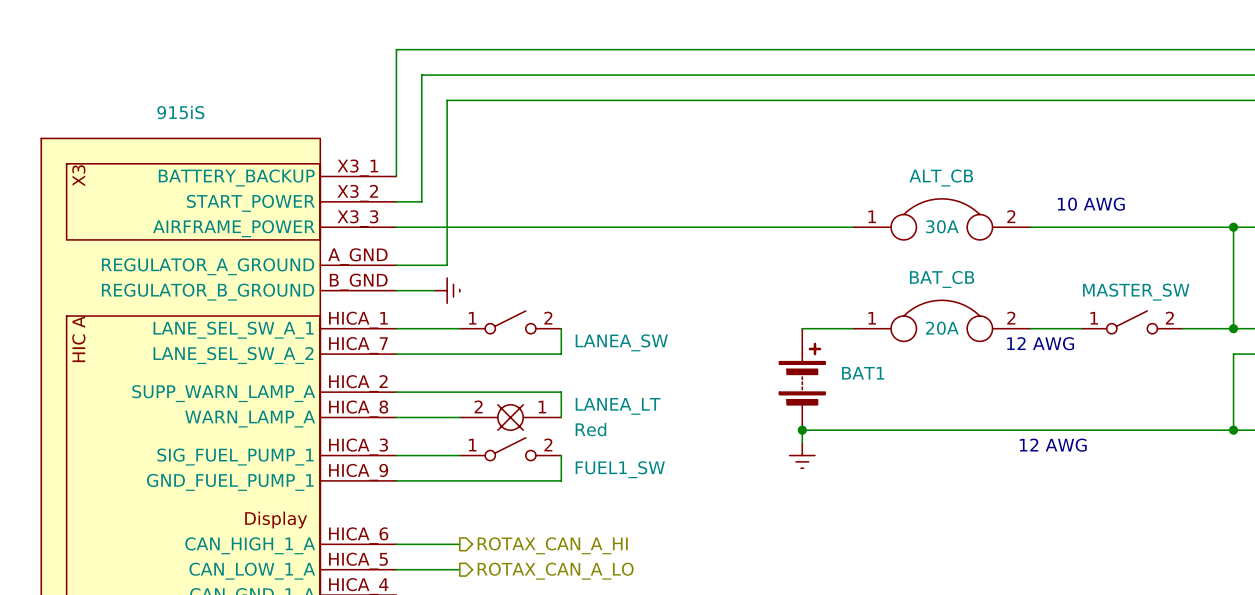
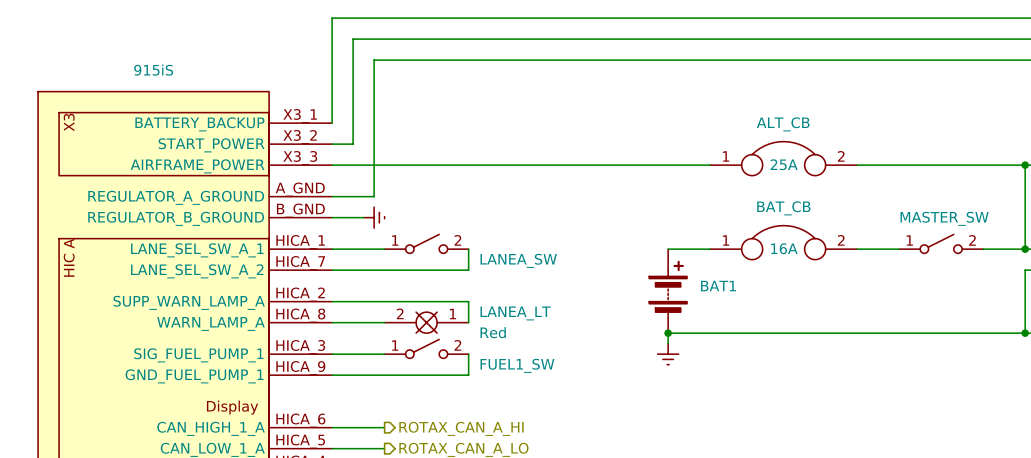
text: 10 AWG (1091, 204) -> none
ALT_CB value: 30A (942, 226) -> 25A (784, 164)
BAT_CB value: 20A (942, 328) -> 16A (784, 248)
text: 12 AWG (1040, 343) -> none
text: 12 AWG (1053, 445) -> none

